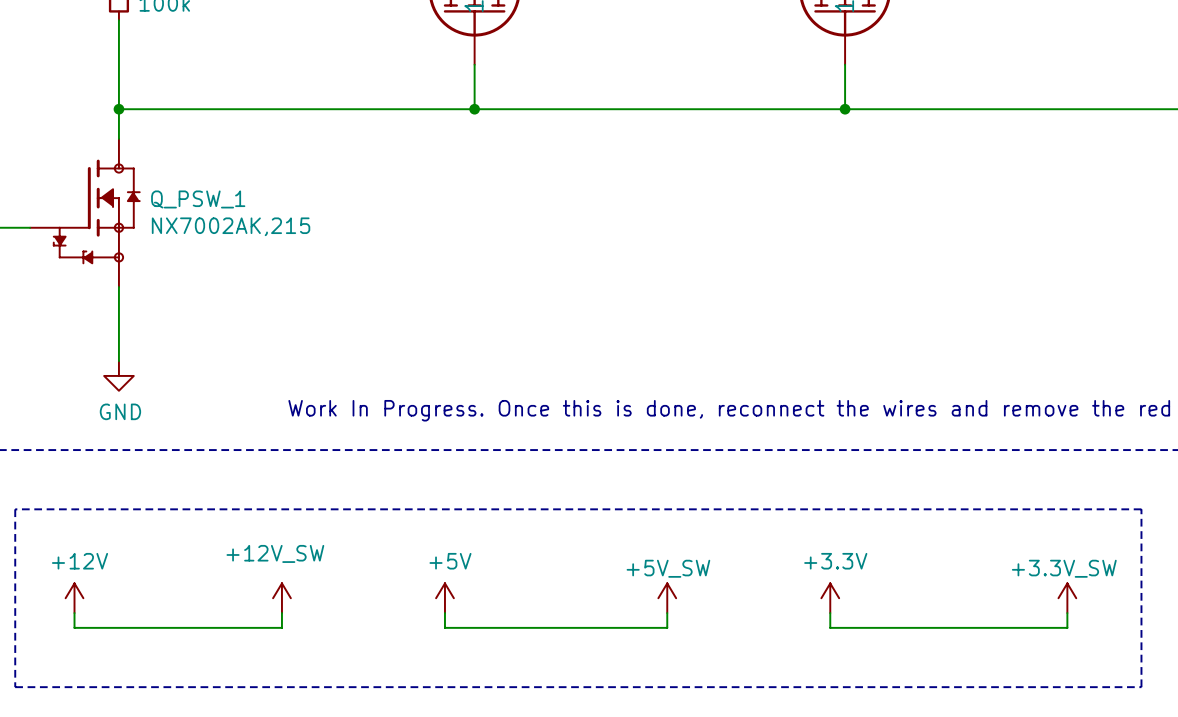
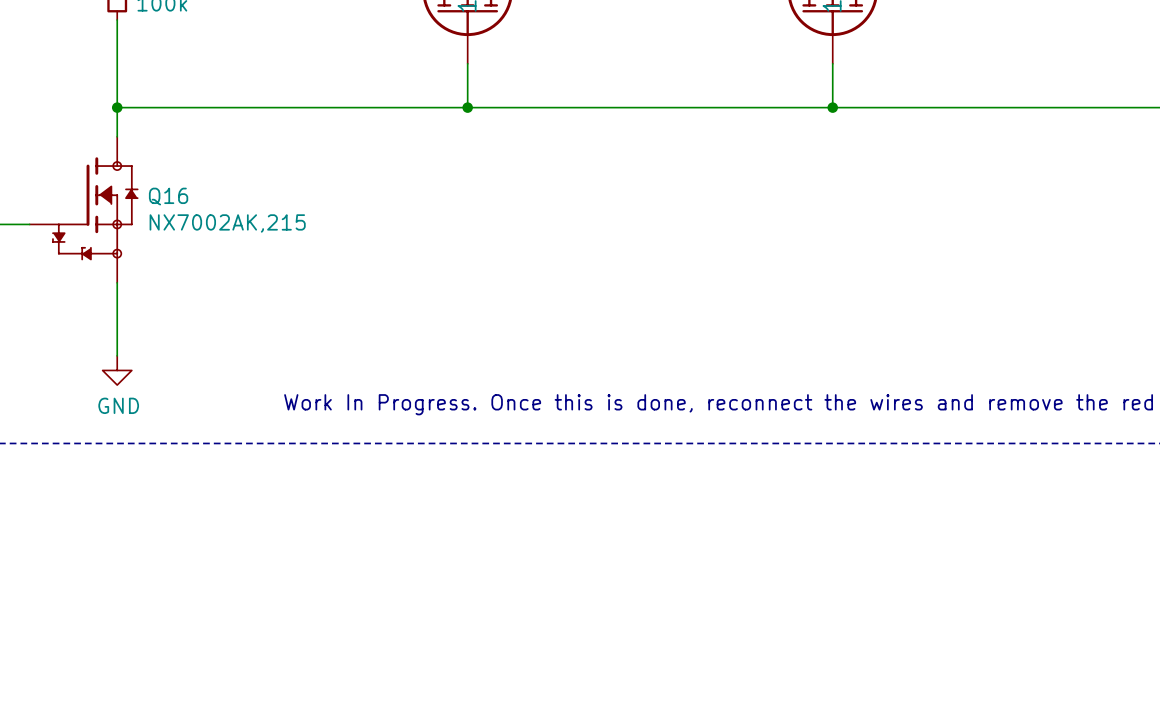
Q_PSW_1 name: Q_PSW_1 (198, 199) -> Q16 (168, 196)
line: (15, 509) (1141, 509) (1141, 687) (15, 687) (15, 509) -> none
power symbol: +12V (74, 598) -> none
power symbol: +12V_SW (281, 598) -> none
power symbol: +5V (444, 598) -> none
power symbol: +5V_SW (667, 598) -> none
power symbol: +3.3V (830, 598) -> none
power symbol: +3.3V_SW (1067, 598) -> none
wire: (74, 613) (74, 627) (281, 627) (281, 613) -> none
wire: (444, 613) (444, 627) (667, 627) (667, 613) -> none
wire: (830, 613) (830, 627) (1067, 627) (1067, 613) -> none

